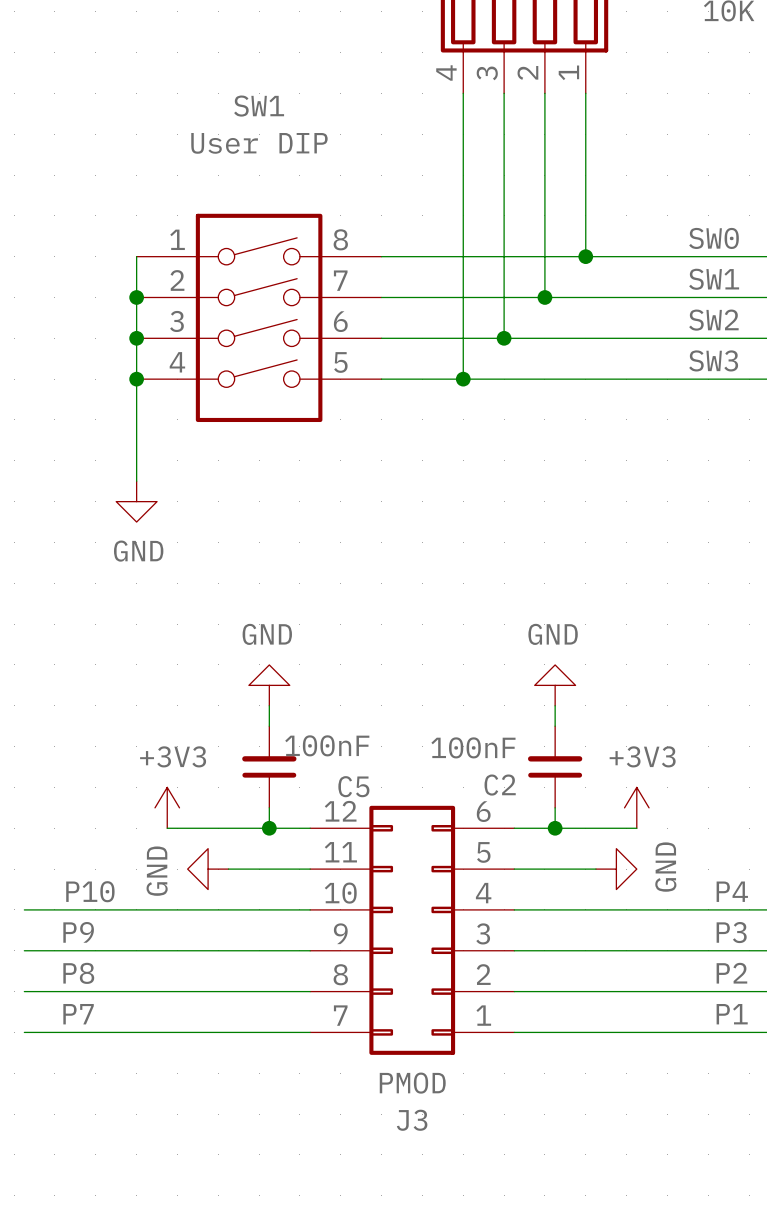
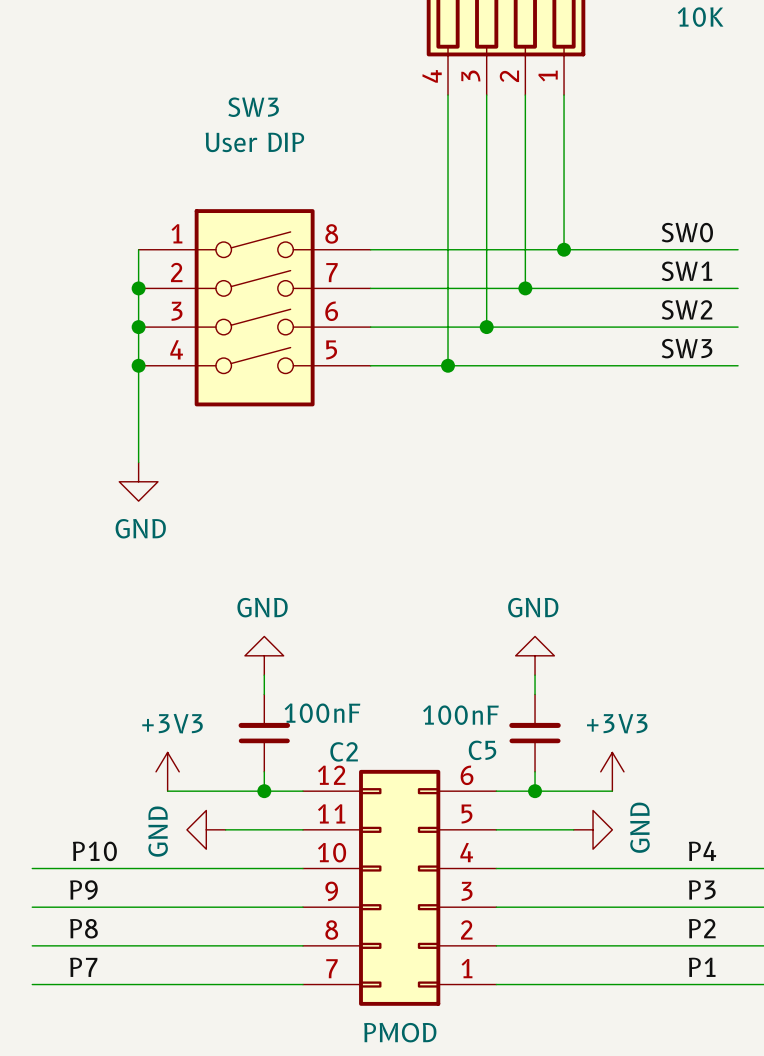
SW1 name: SW1 (259, 106) -> SW3 (253, 107)
C2 name: C2 (500, 785) -> C5 (482, 750)
C5 name: C5 (353, 786) -> C2 (344, 751)

